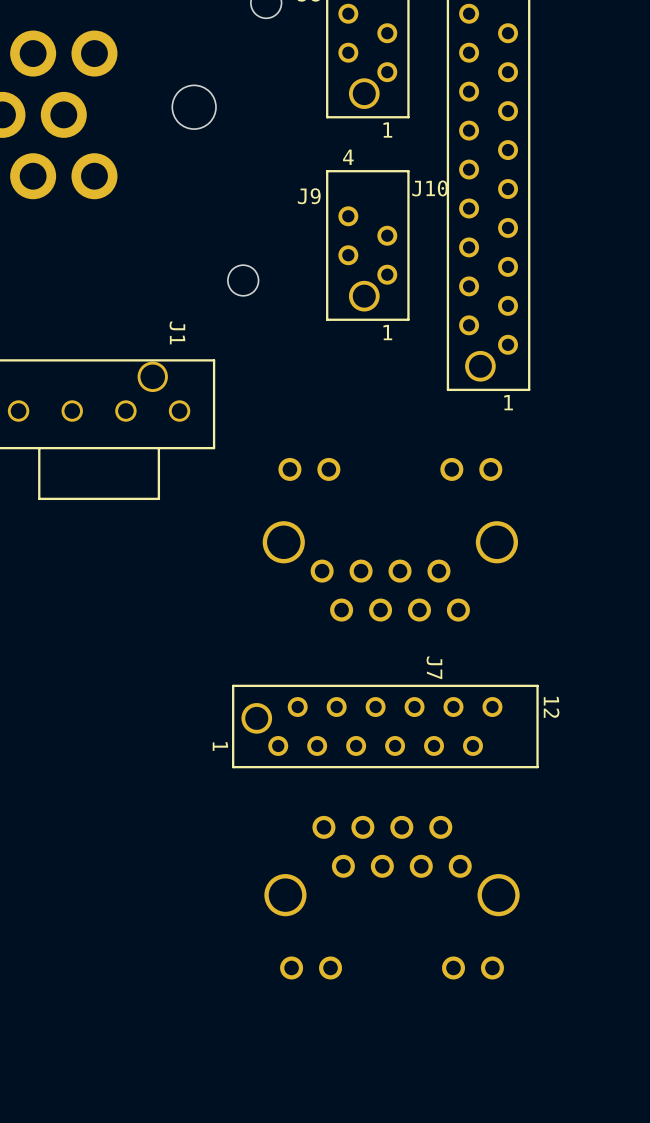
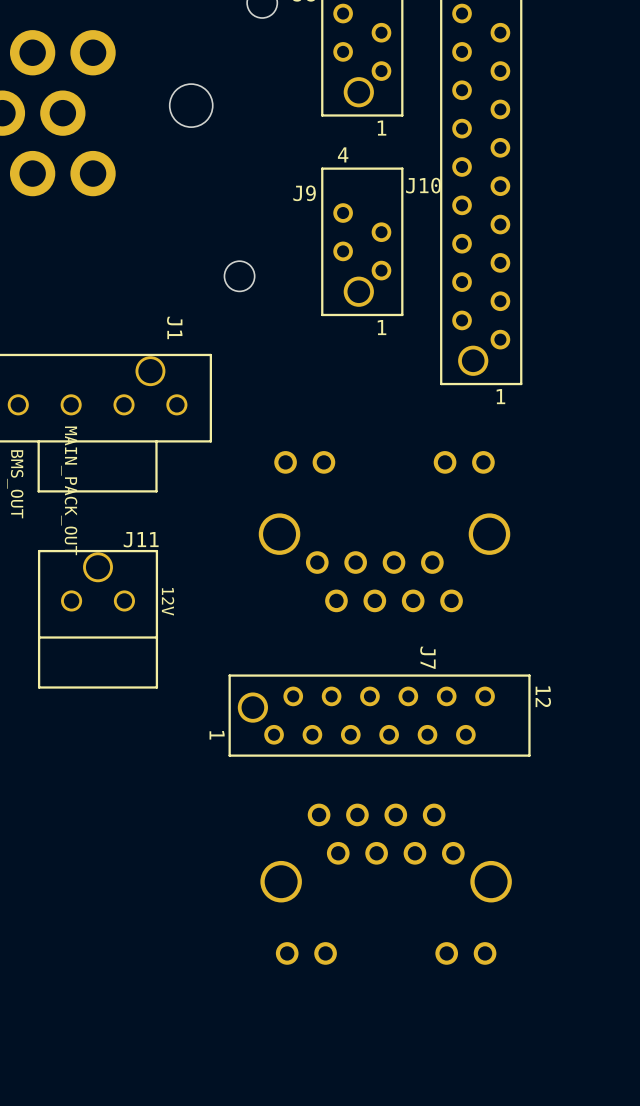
text: none -> BMS_OUT (15, 484)
text: none -> MAIN_PACK_OUT (69, 490)
text: none -> 12V (168, 601)
J11: none -> (98, 619)

